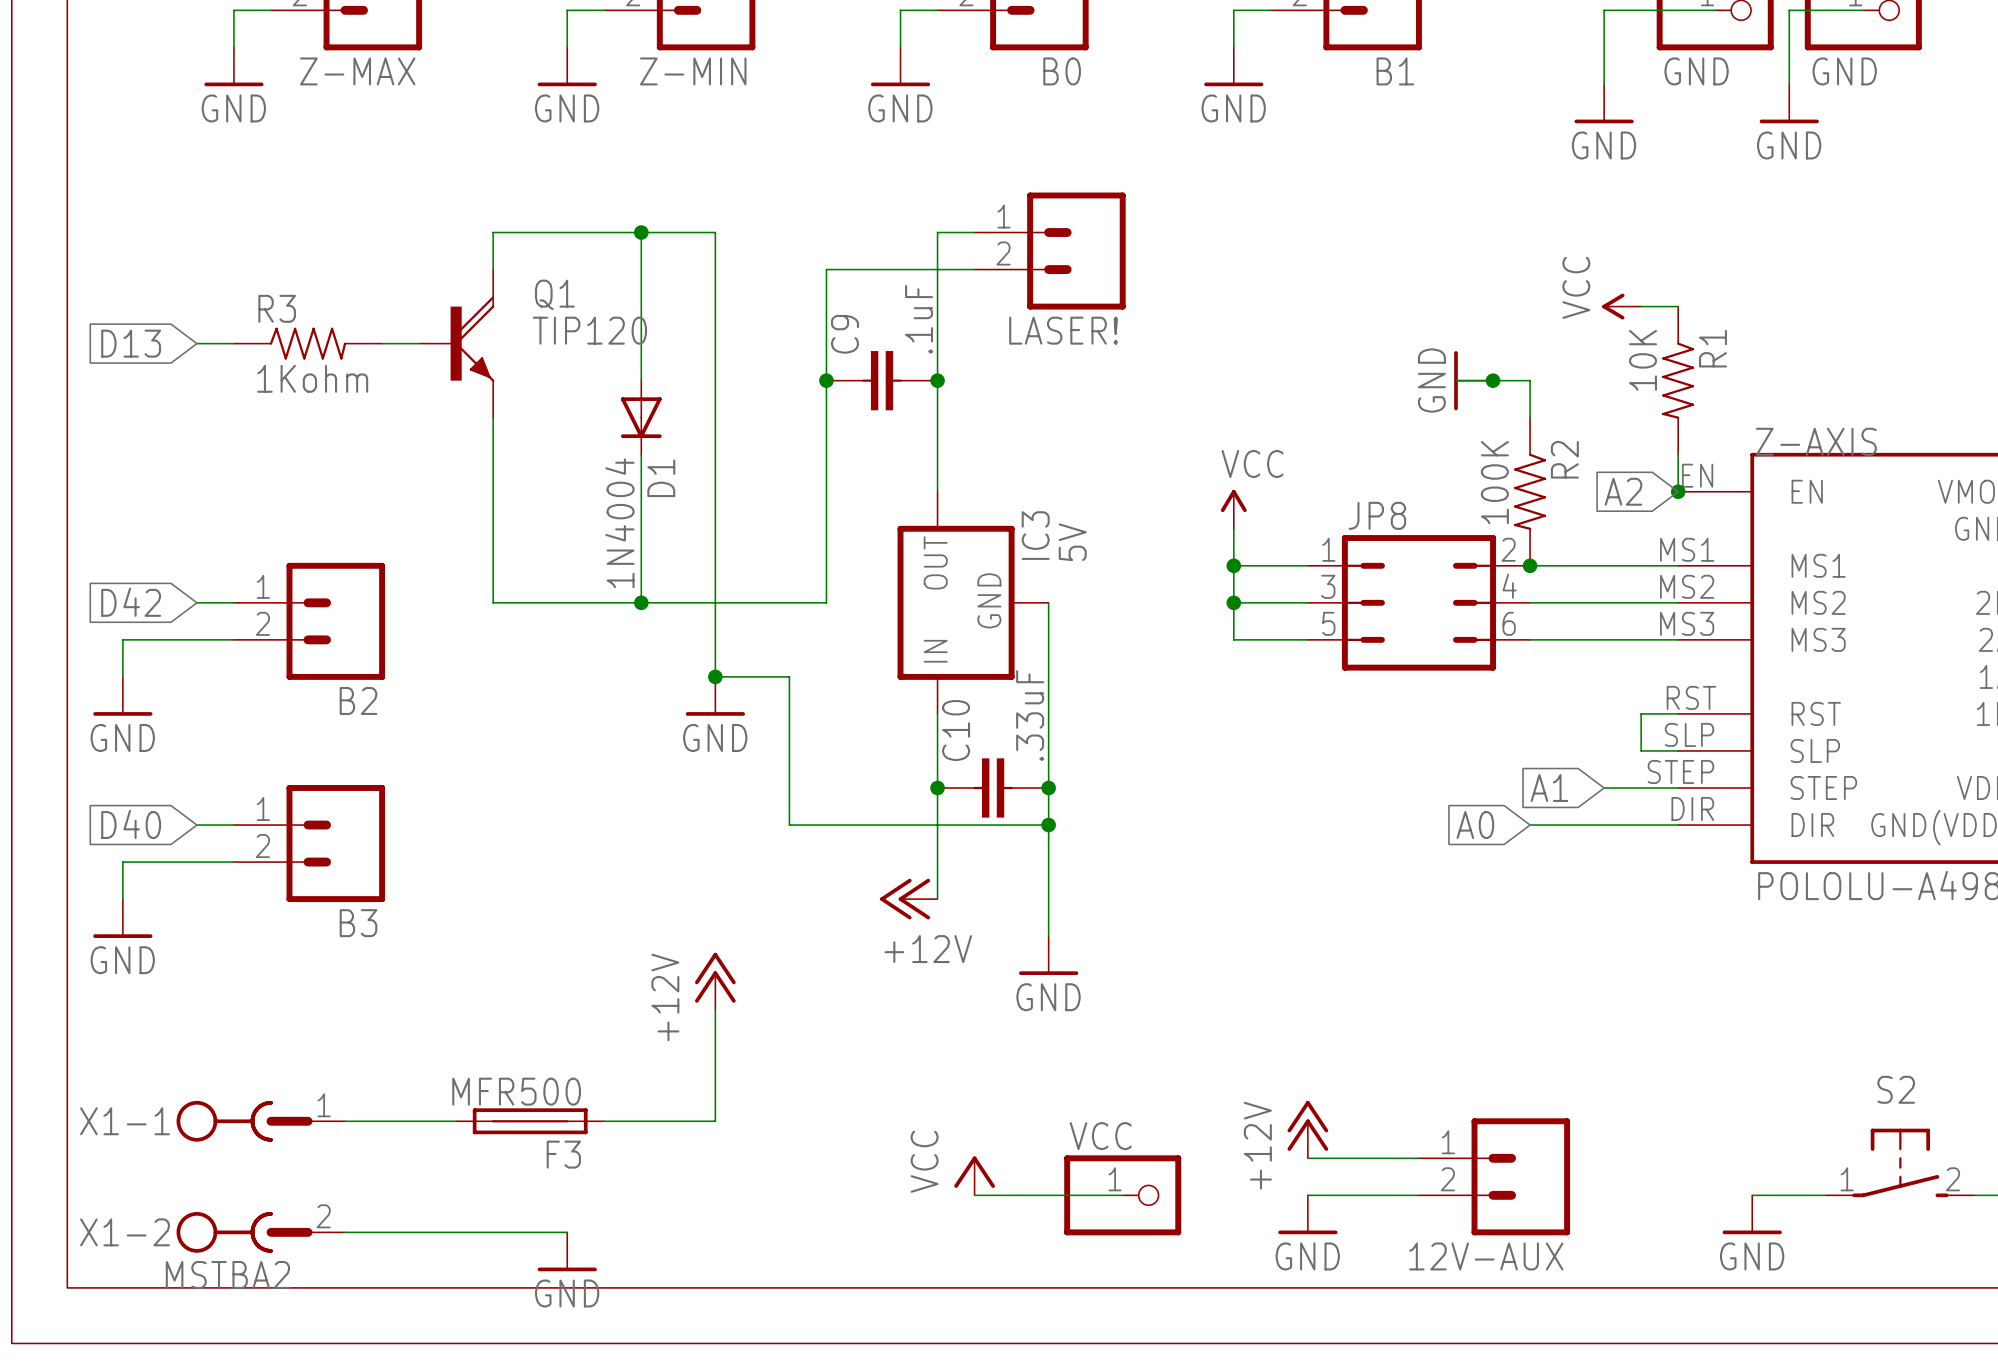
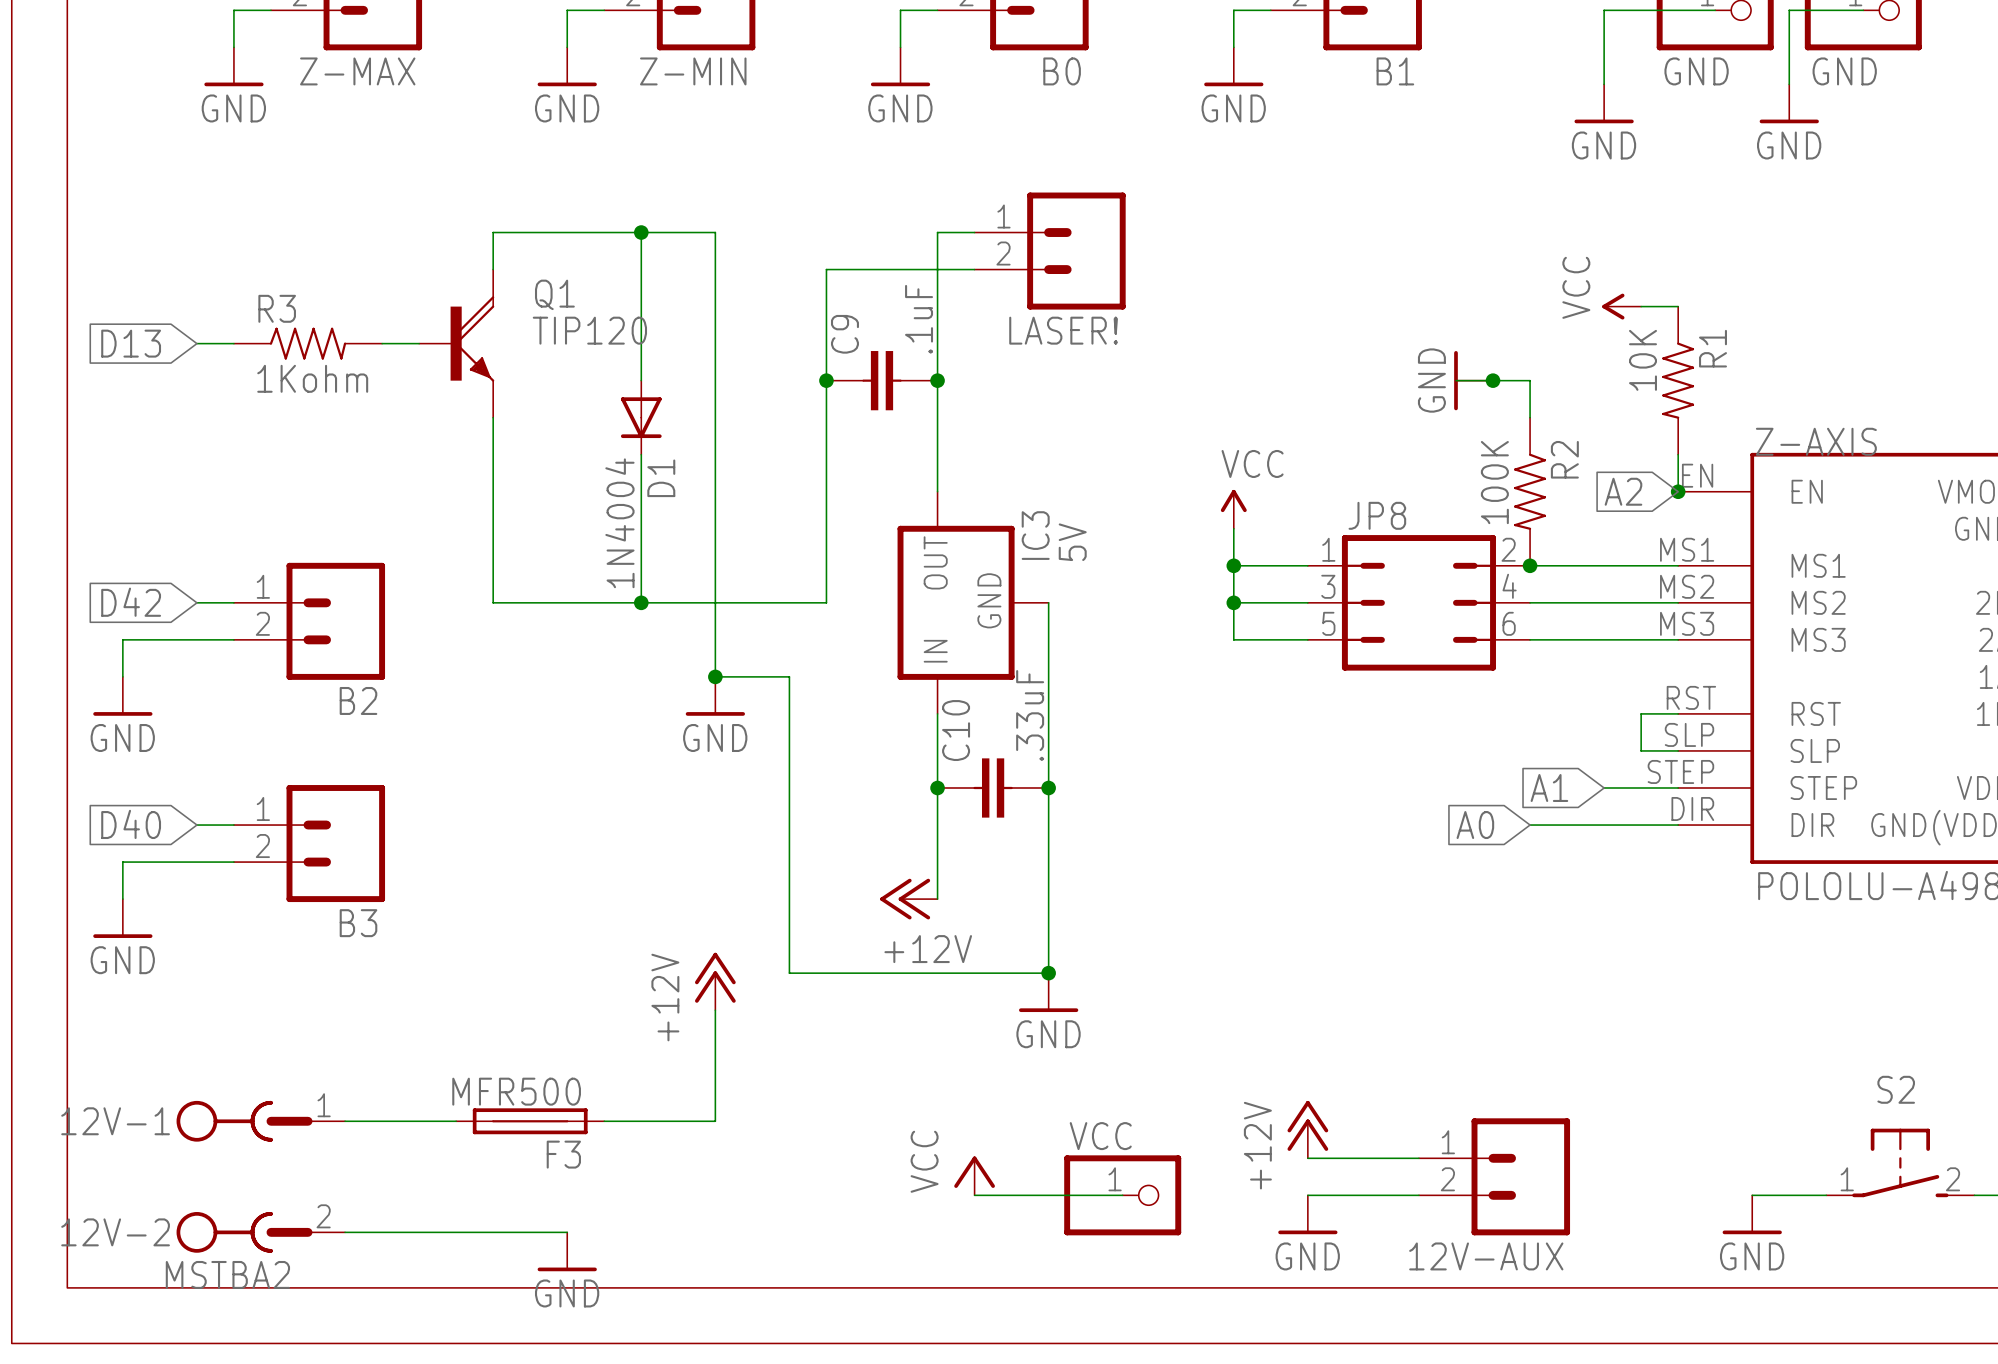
wire: (789, 825) (1048, 825) -> (789, 825) (789, 973) (1048, 973) (1048, 936)
junction: (1048, 825) -> none
power symbol position: GND (1048, 955) -> GND (1048, 992)
junction: none -> (1048, 973)
X1-1 name: X1-1 (125, 1121) -> 12V-1 (115, 1121)
X1-2 name: X1-2 (125, 1232) -> 12V-2 (115, 1232)

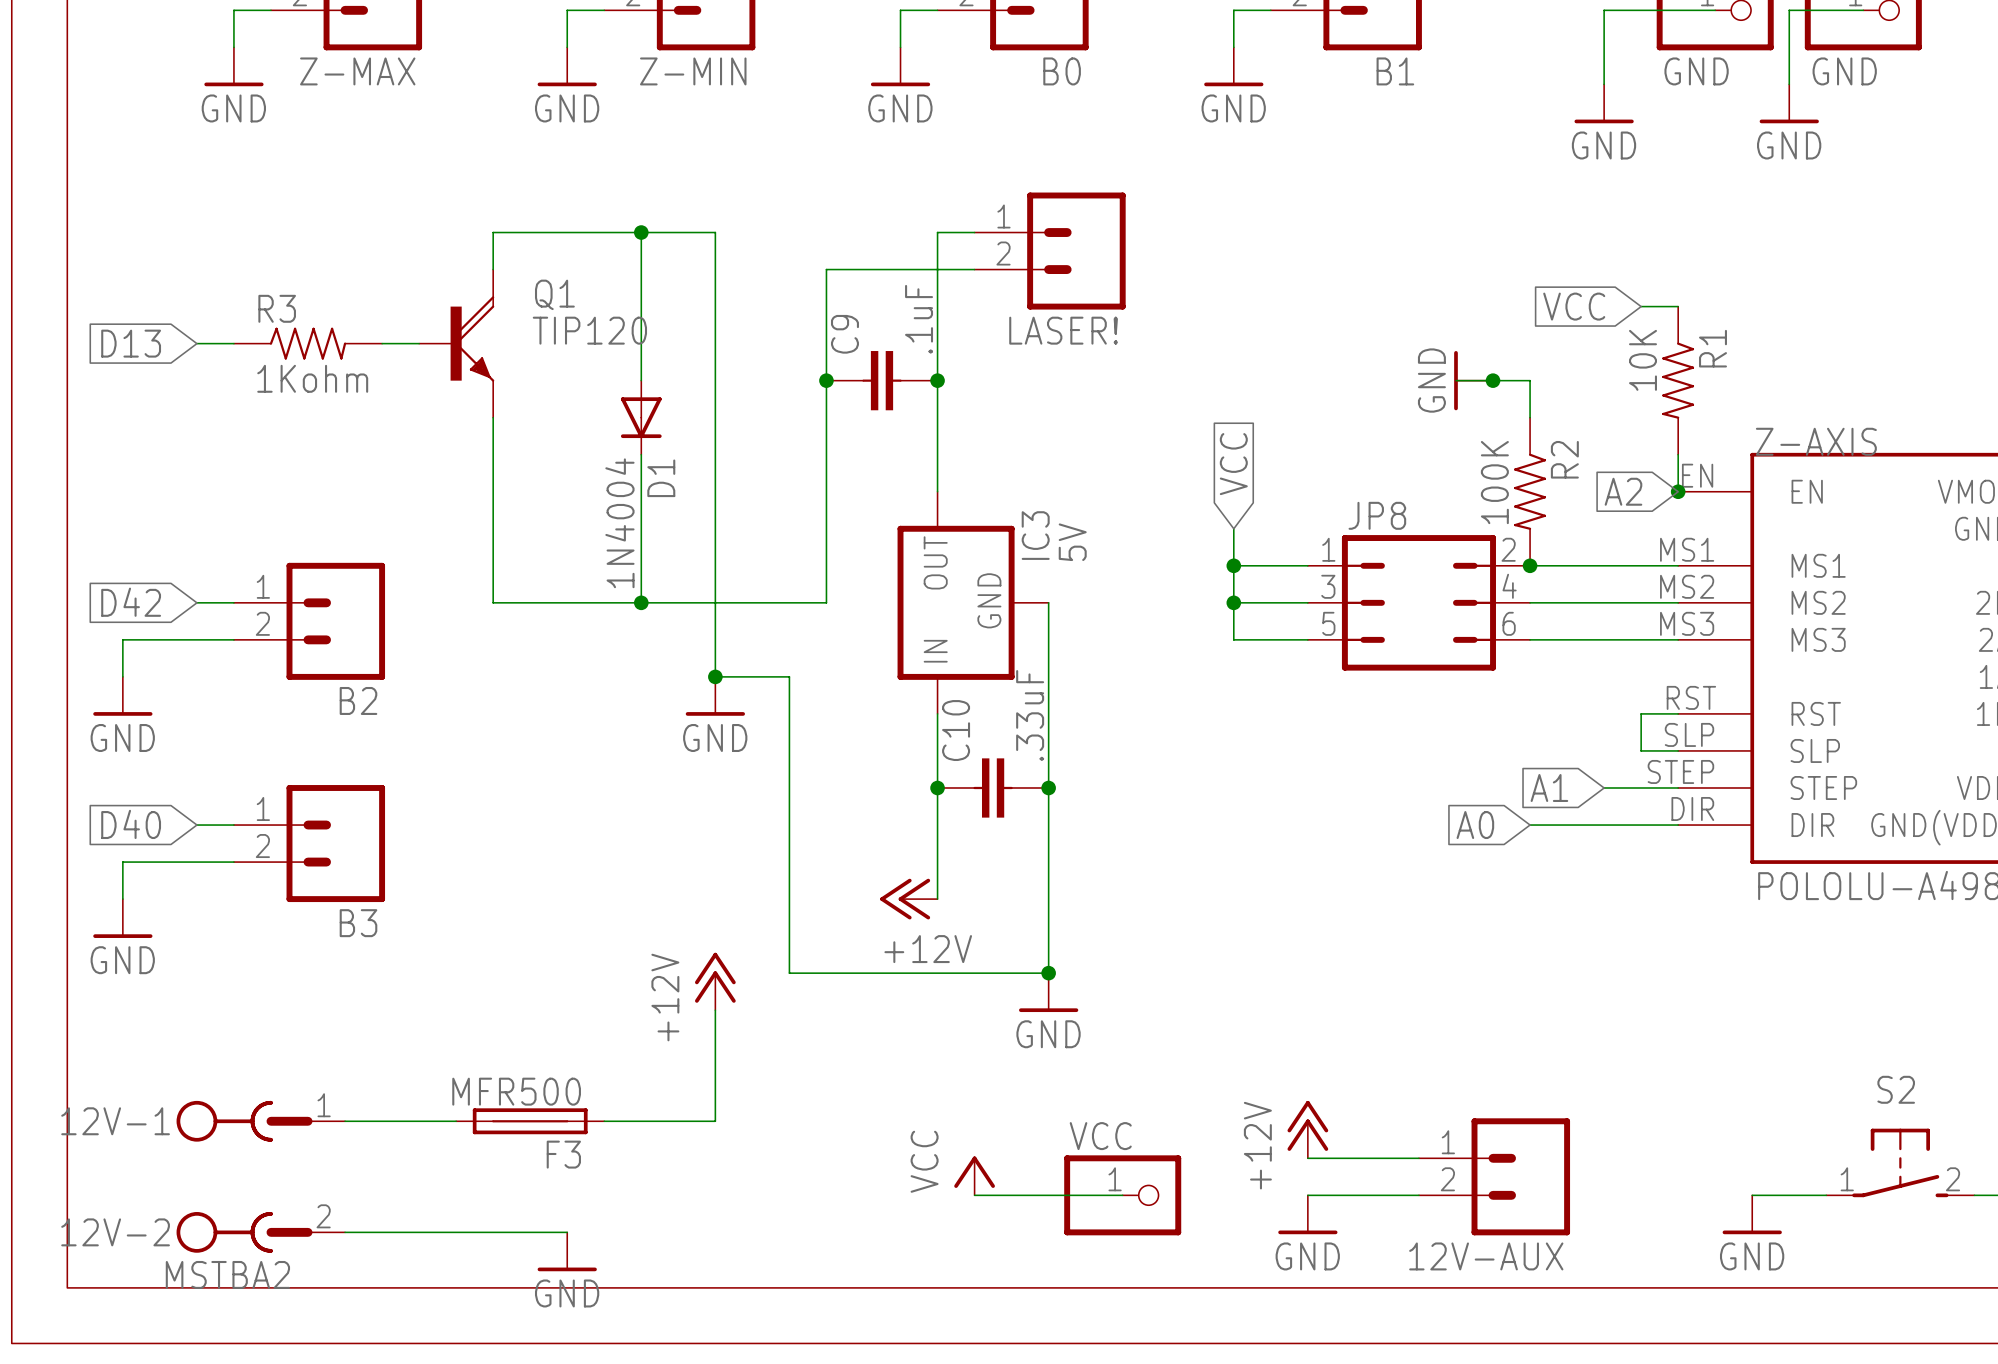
global label: none -> VCC (1574, 306)
power symbol: VCC (1621, 306) -> none
global label: none -> VCC (1233, 464)
power symbol: VCC (1233, 509) -> none

